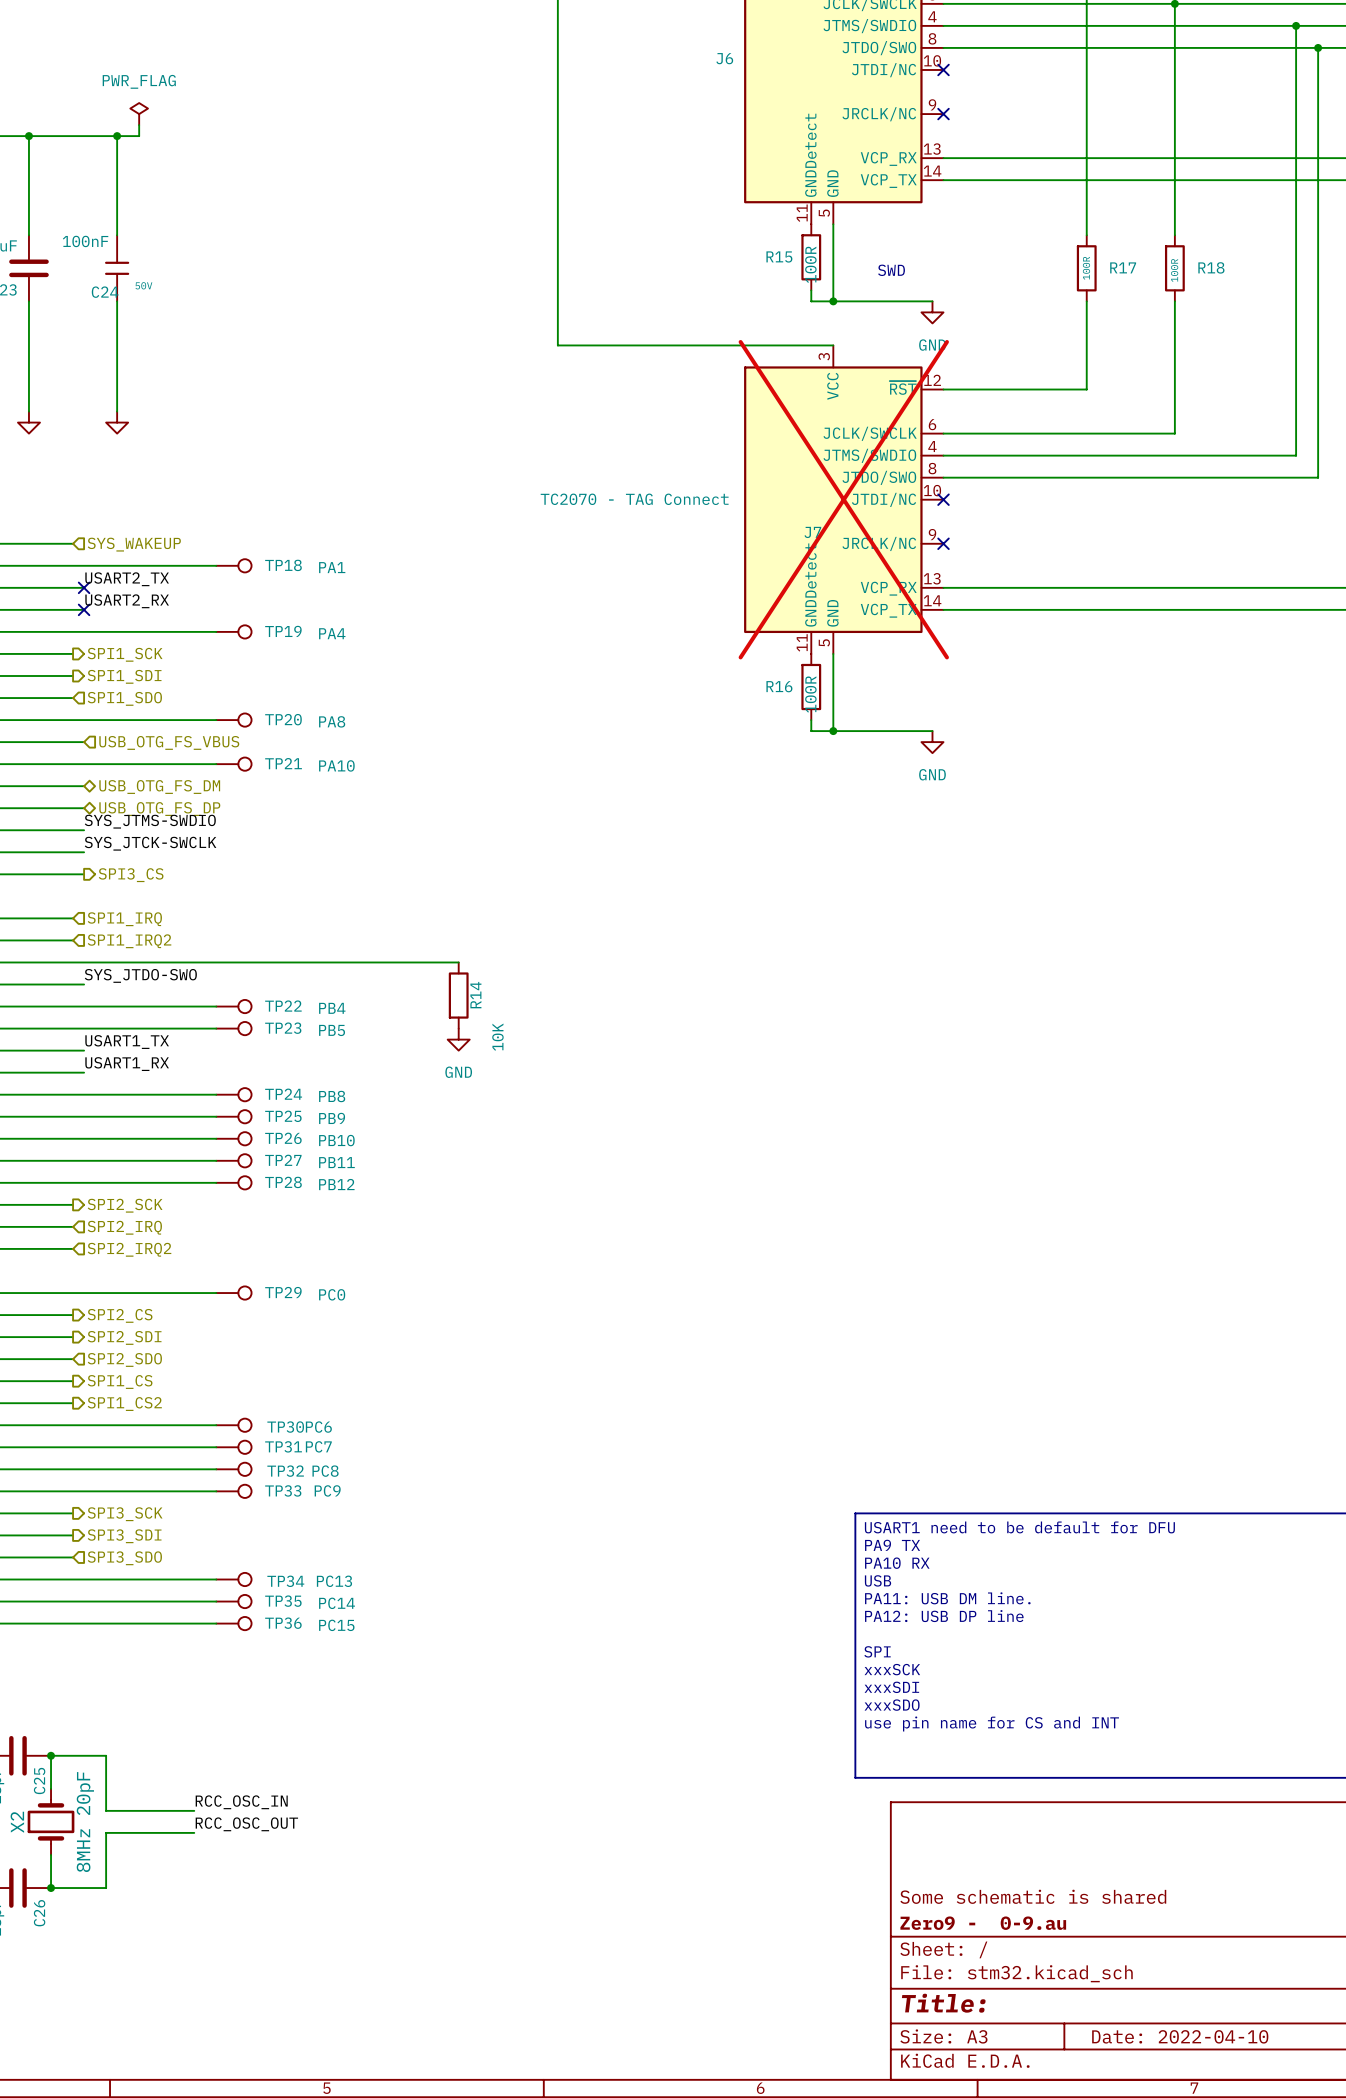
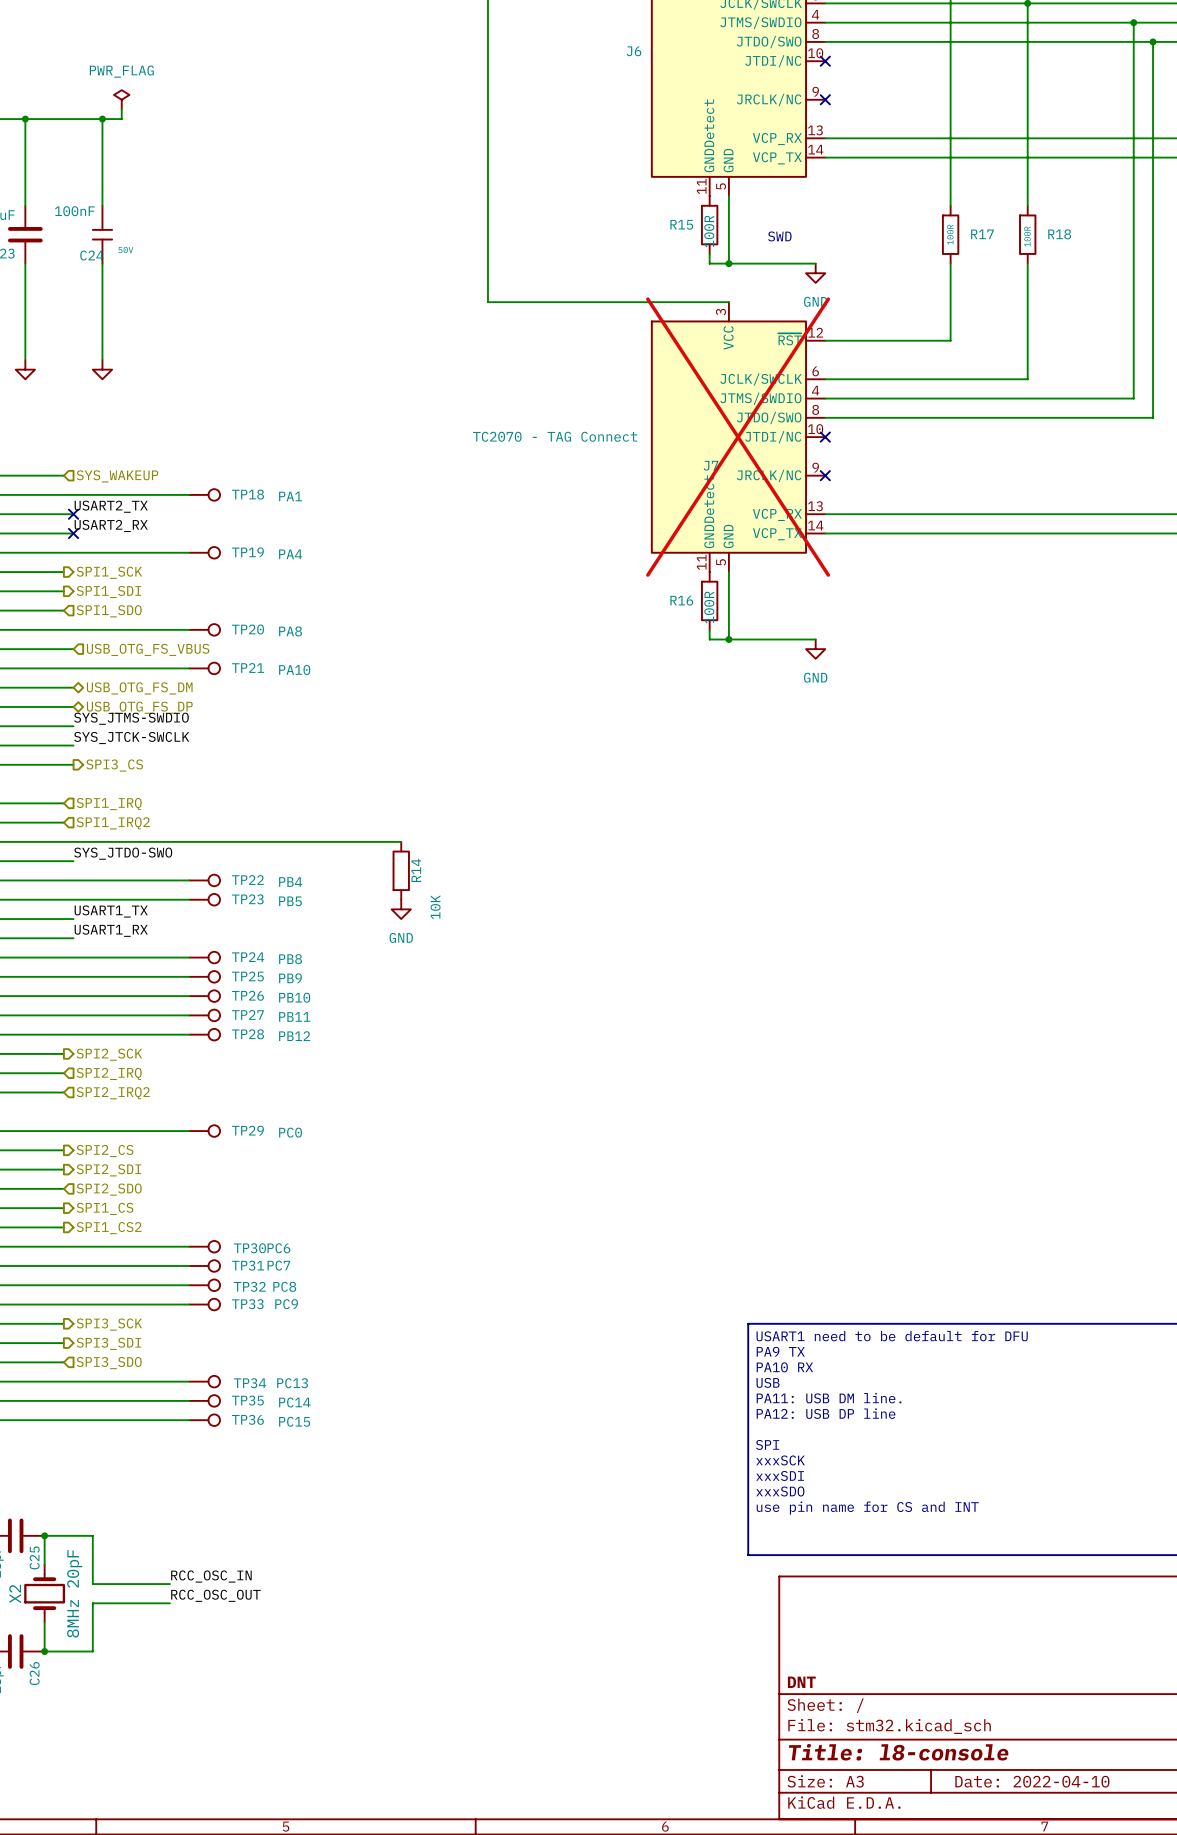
title block: Some schematic is shared (1033, 1896) -> none
title block: Zero9 - 0-9.au (983, 1923) -> DNT (801, 1682)
title block: Title: (943, 2003) -> Title: l8-console (898, 1752)

